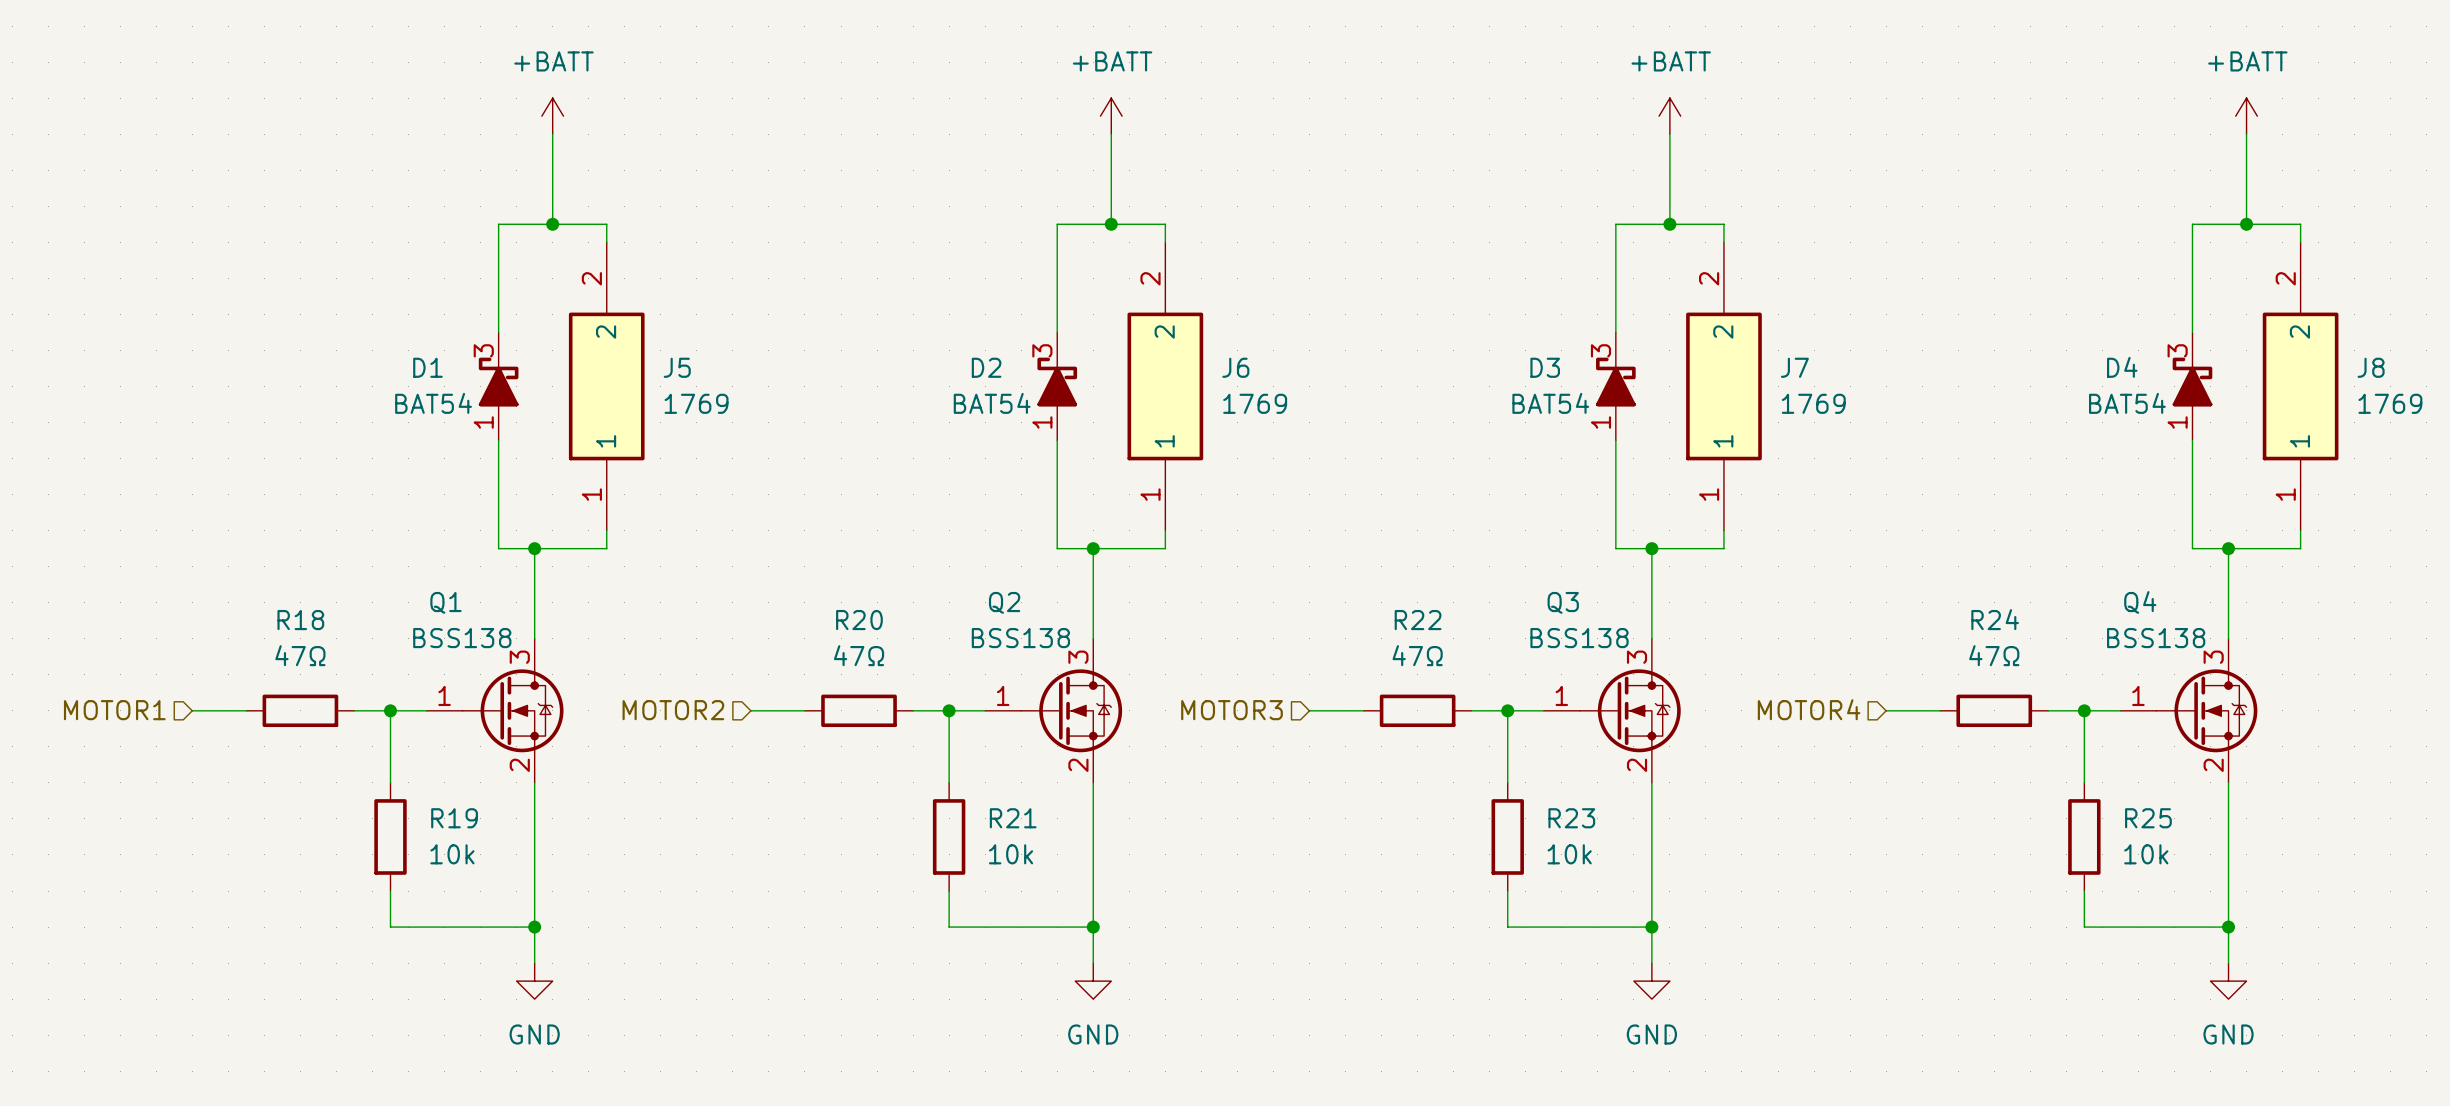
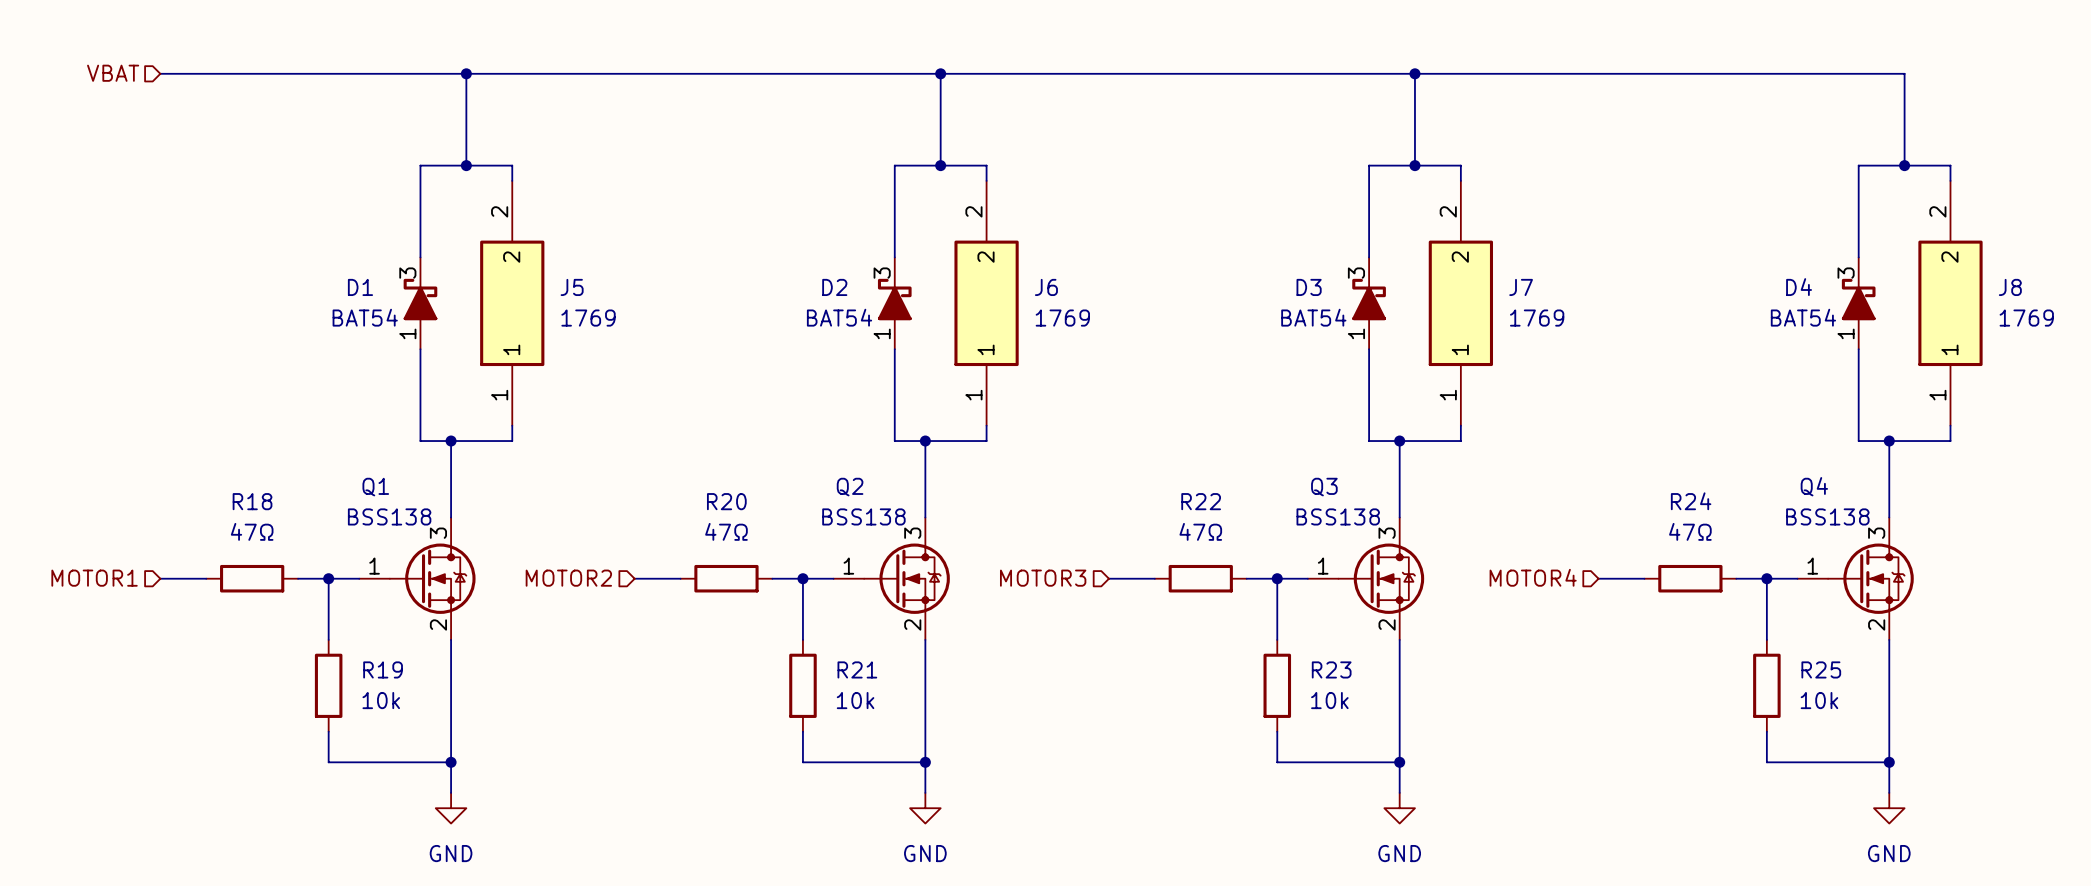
hierarchical label: none -> VBAT (113, 73)
wire: none -> (160, 73) (1904, 73) (1904, 89)
power symbol: +BATT (552, 116) -> none
junction: none -> (466, 73)
power symbol: +BATT (1111, 116) -> none
junction: none -> (940, 73)
power symbol: +BATT (1669, 116) -> none
junction: none -> (1414, 73)
power symbol: +BATT (2246, 116) -> none

